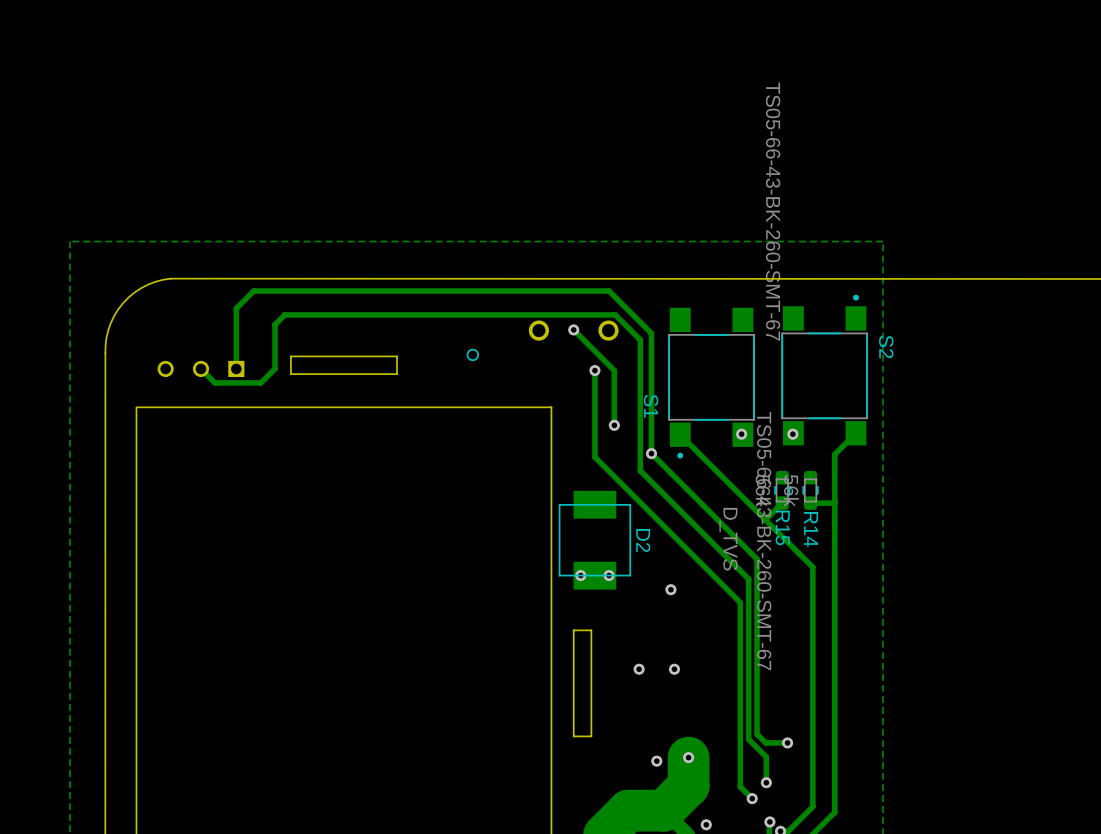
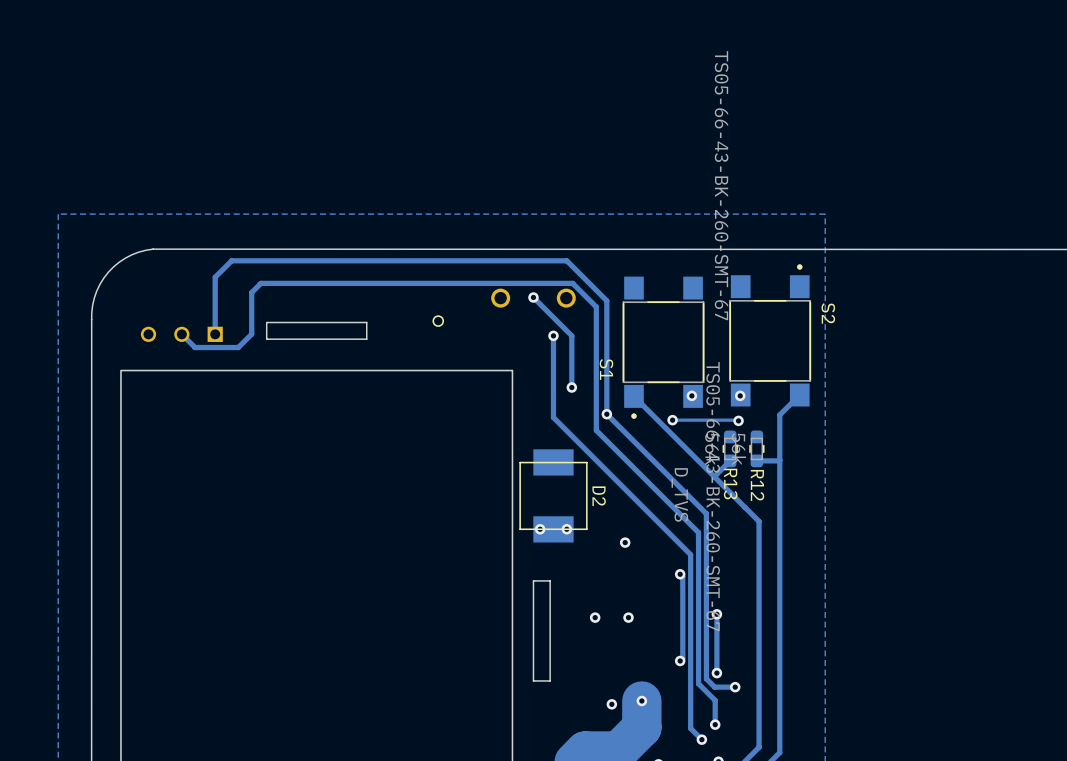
track: none -> (672, 420) (738, 420)
via: none -> (672, 420)
via: none -> (738, 420)
R15 name: R15 (782, 527) -> R13 (730, 484)
R14 name: R14 (811, 529) -> R12 (757, 485)
track: none -> (680, 574) (682, 576) (682, 658) (680, 660)
via: none -> (680, 574)
track: none -> (716, 614) (716, 673)
via: none -> (716, 614)
via: none -> (680, 660)
via: none -> (716, 673)

